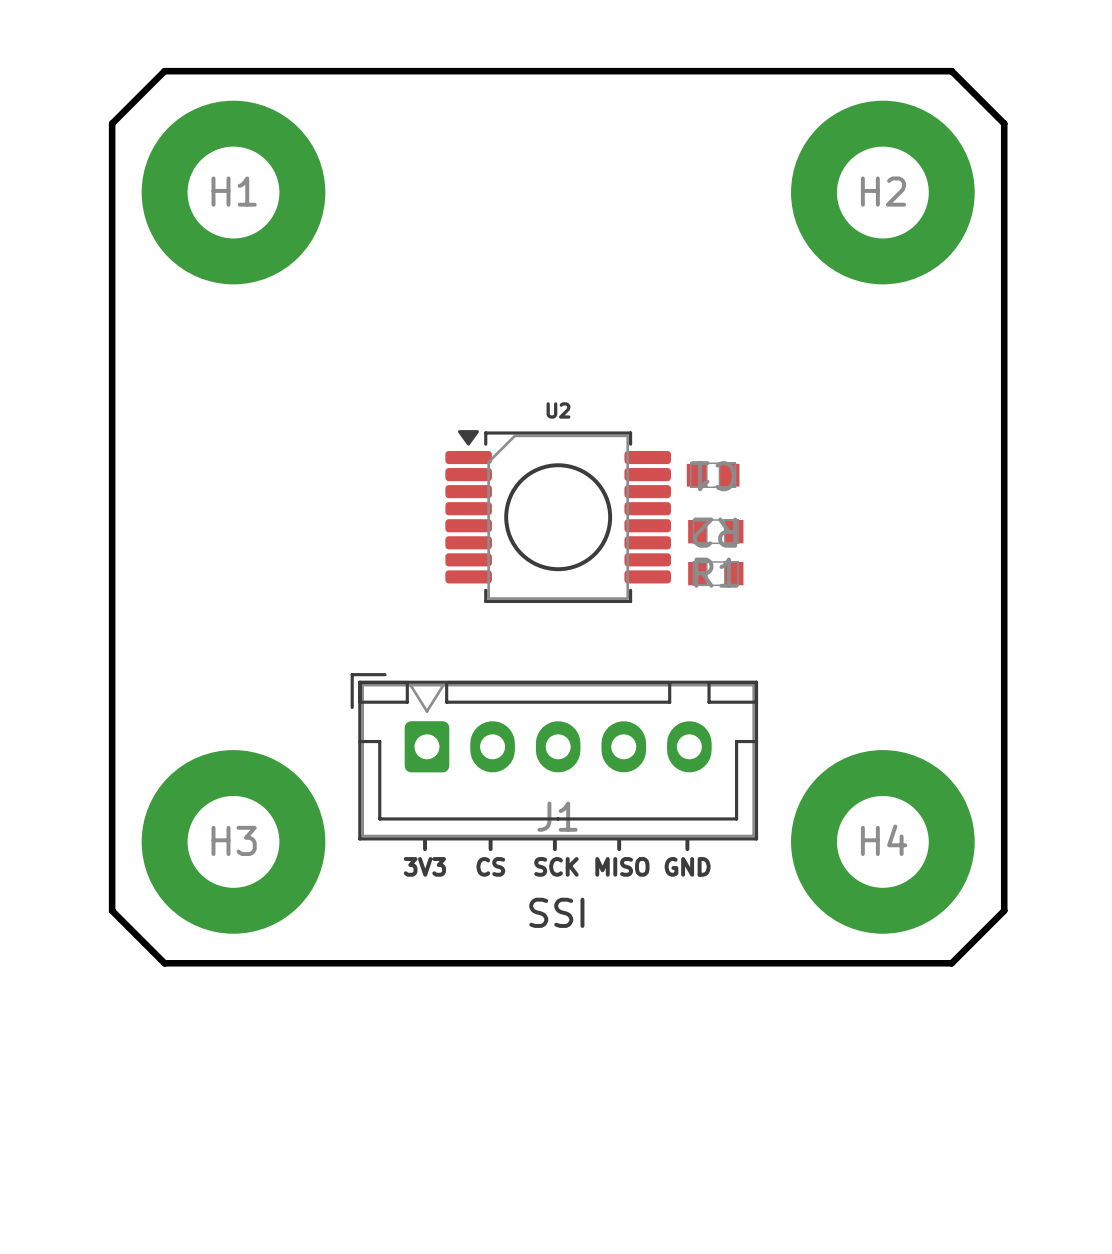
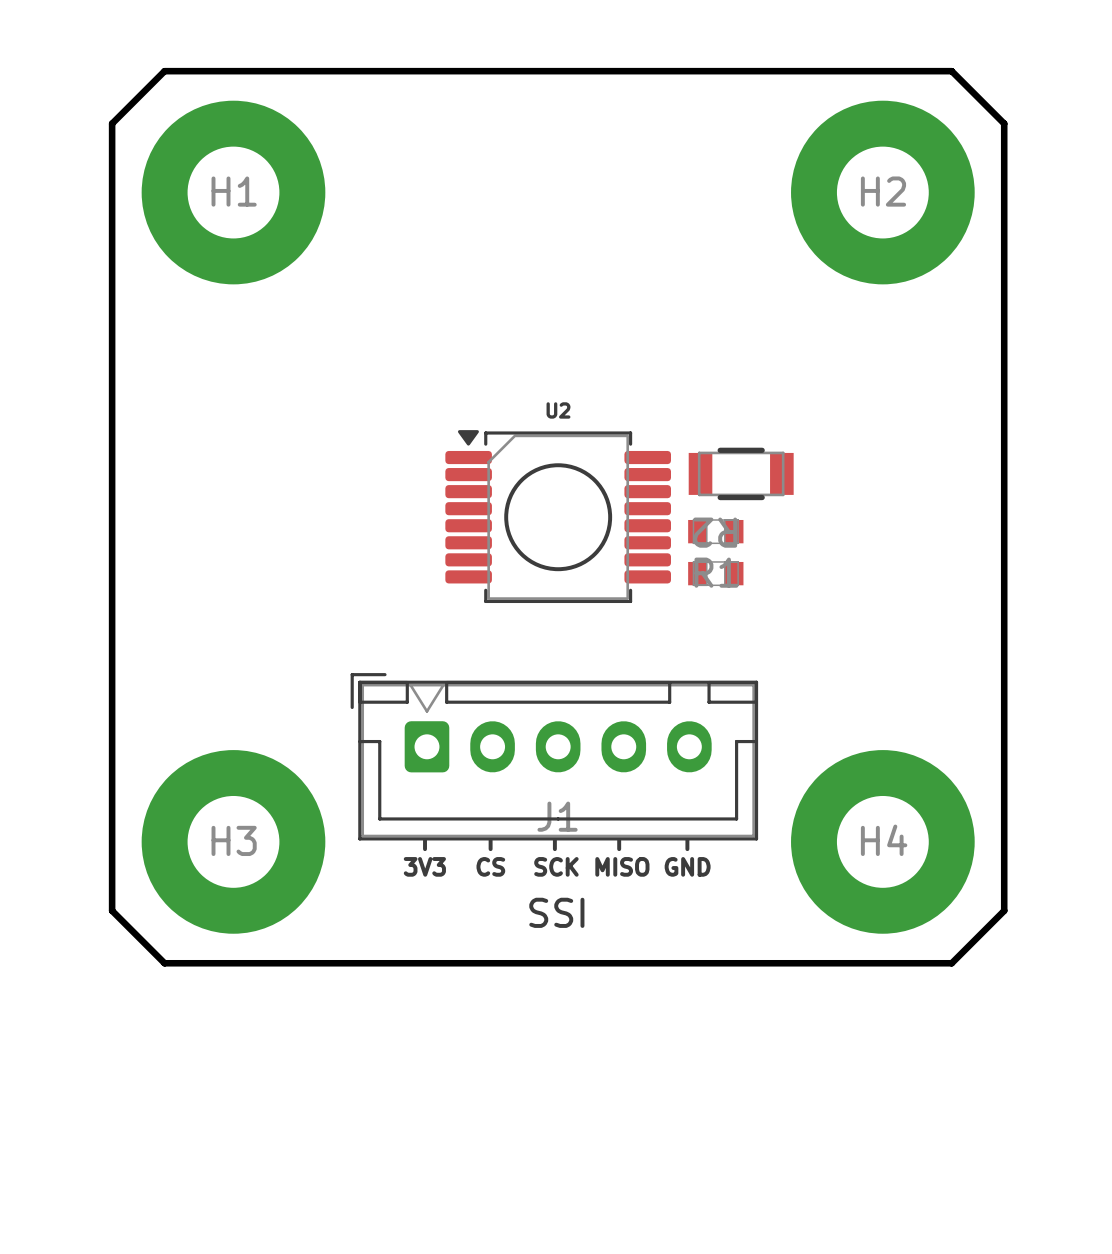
part: none -> (741, 473)
part: (713, 475) -> none

